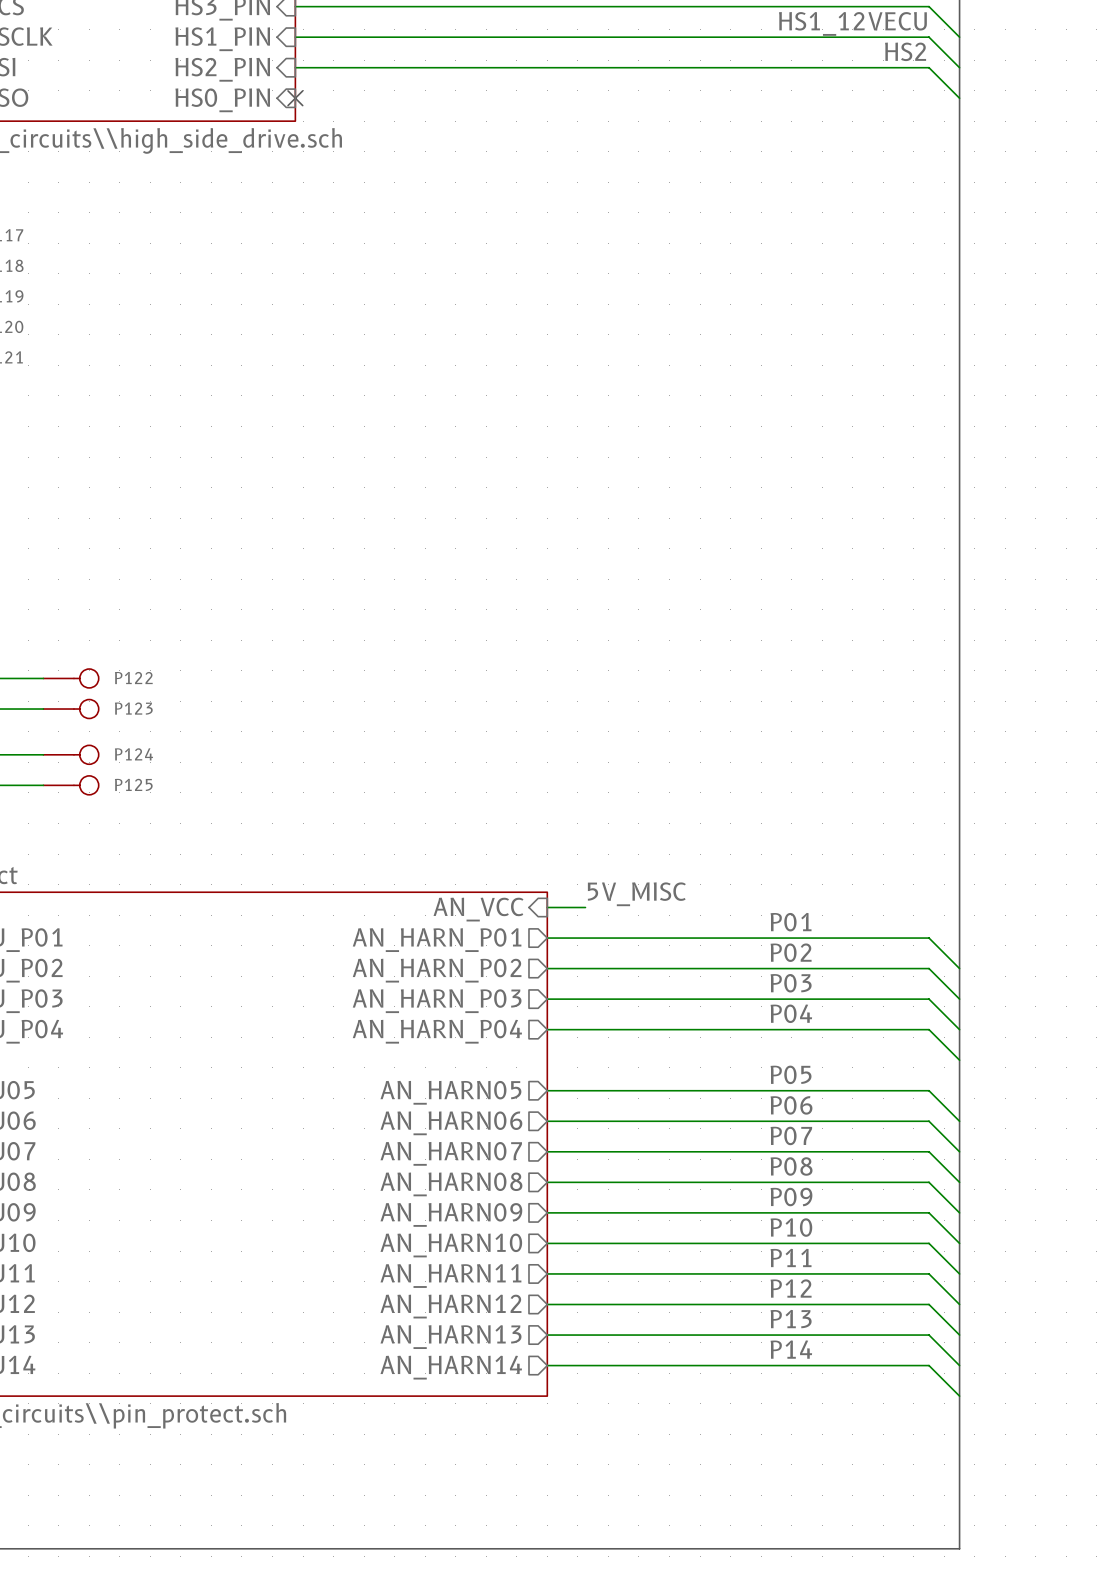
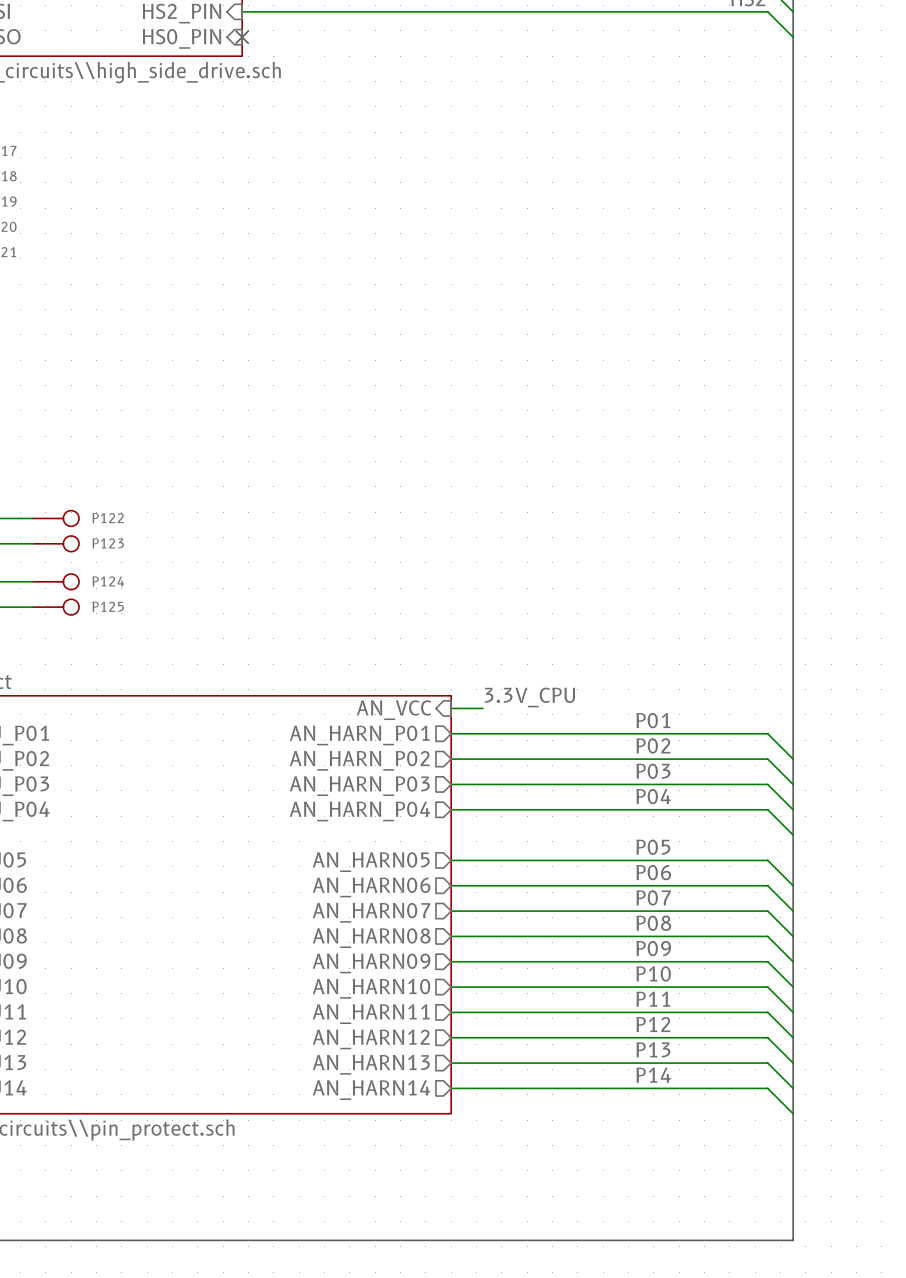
label: 5V_MISC (636, 894) -> 3.3V_CPU (529, 697)

